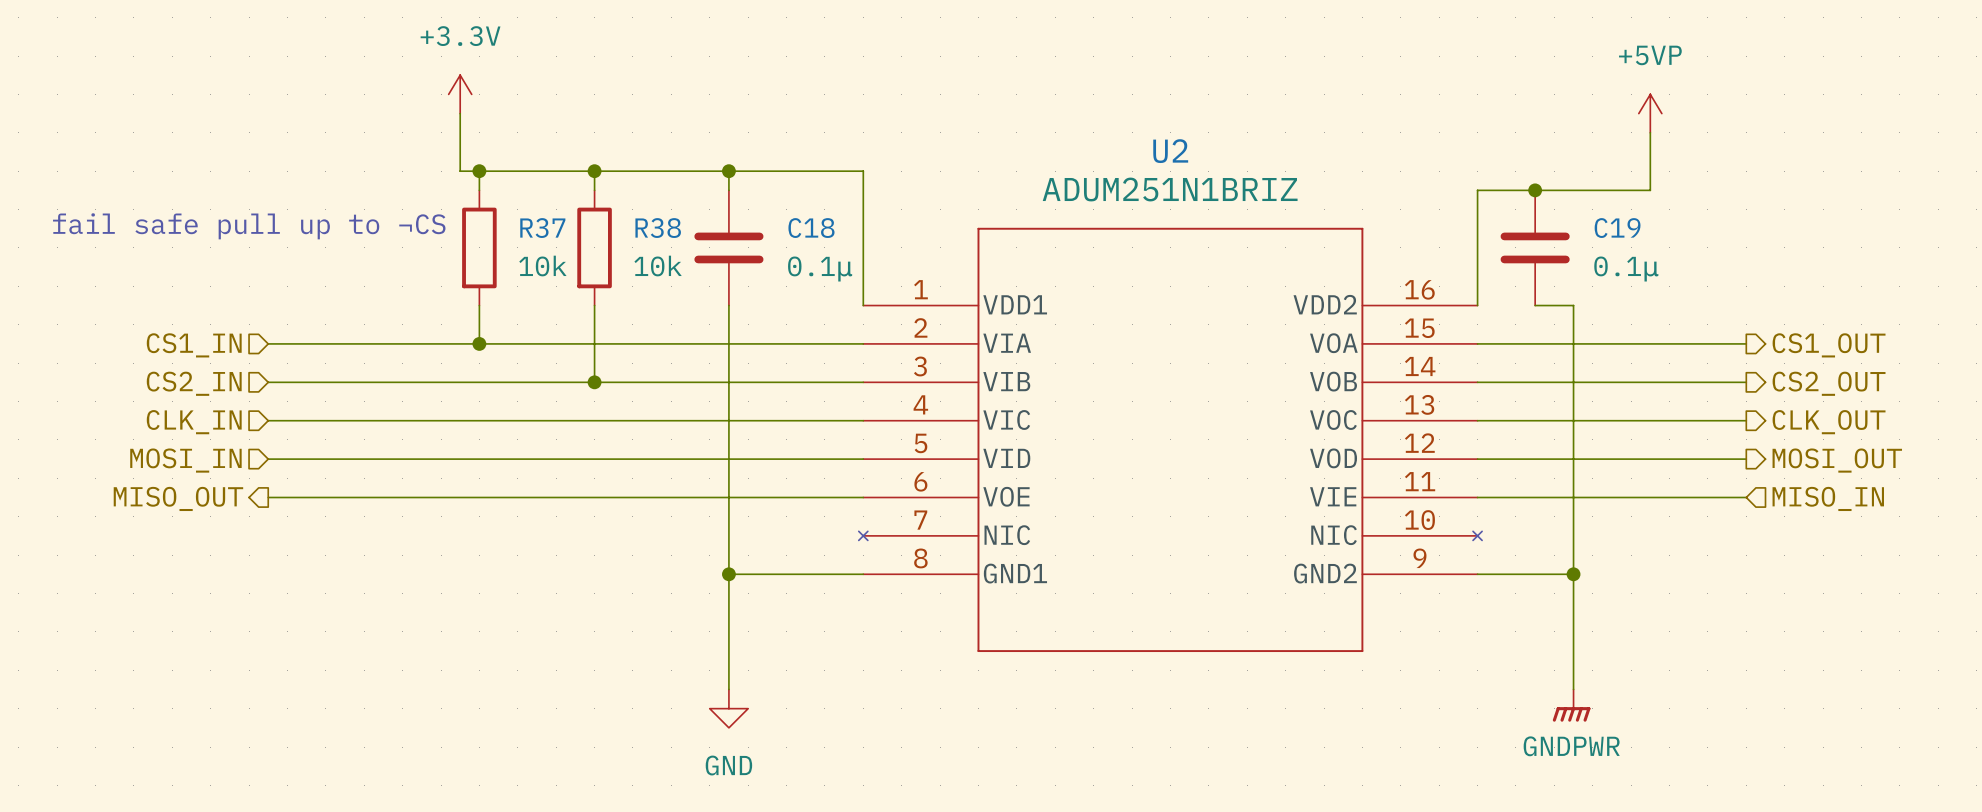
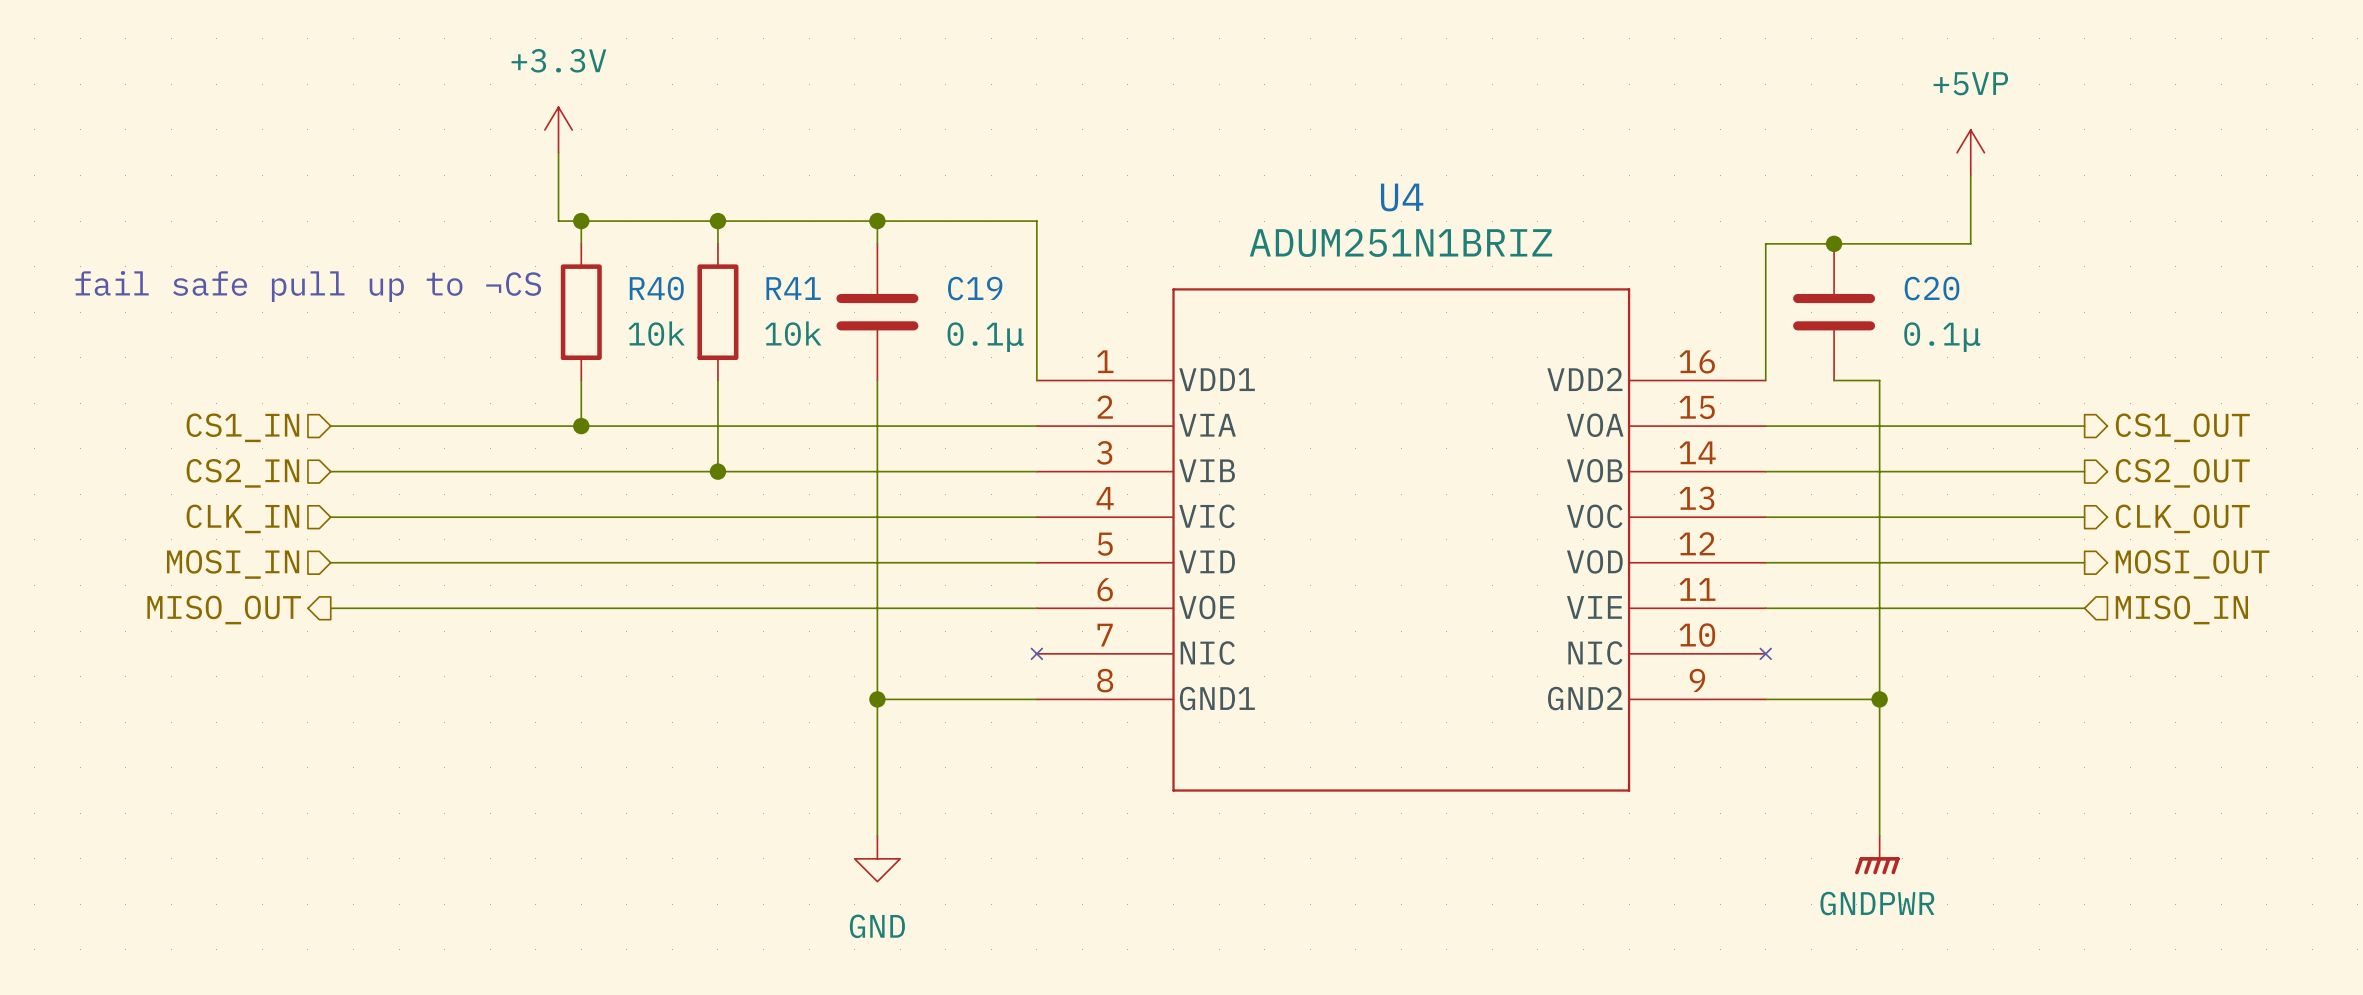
U2 name: U2 (1170, 151) -> U4 (1402, 197)
R37 name: R37 (542, 228) -> R40 (656, 288)
R38 name: R38 (658, 228) -> R41 (793, 288)
C18 name: C18 (811, 228) -> C19 (975, 288)
C19 name: C19 (1617, 228) -> C20 (1932, 288)

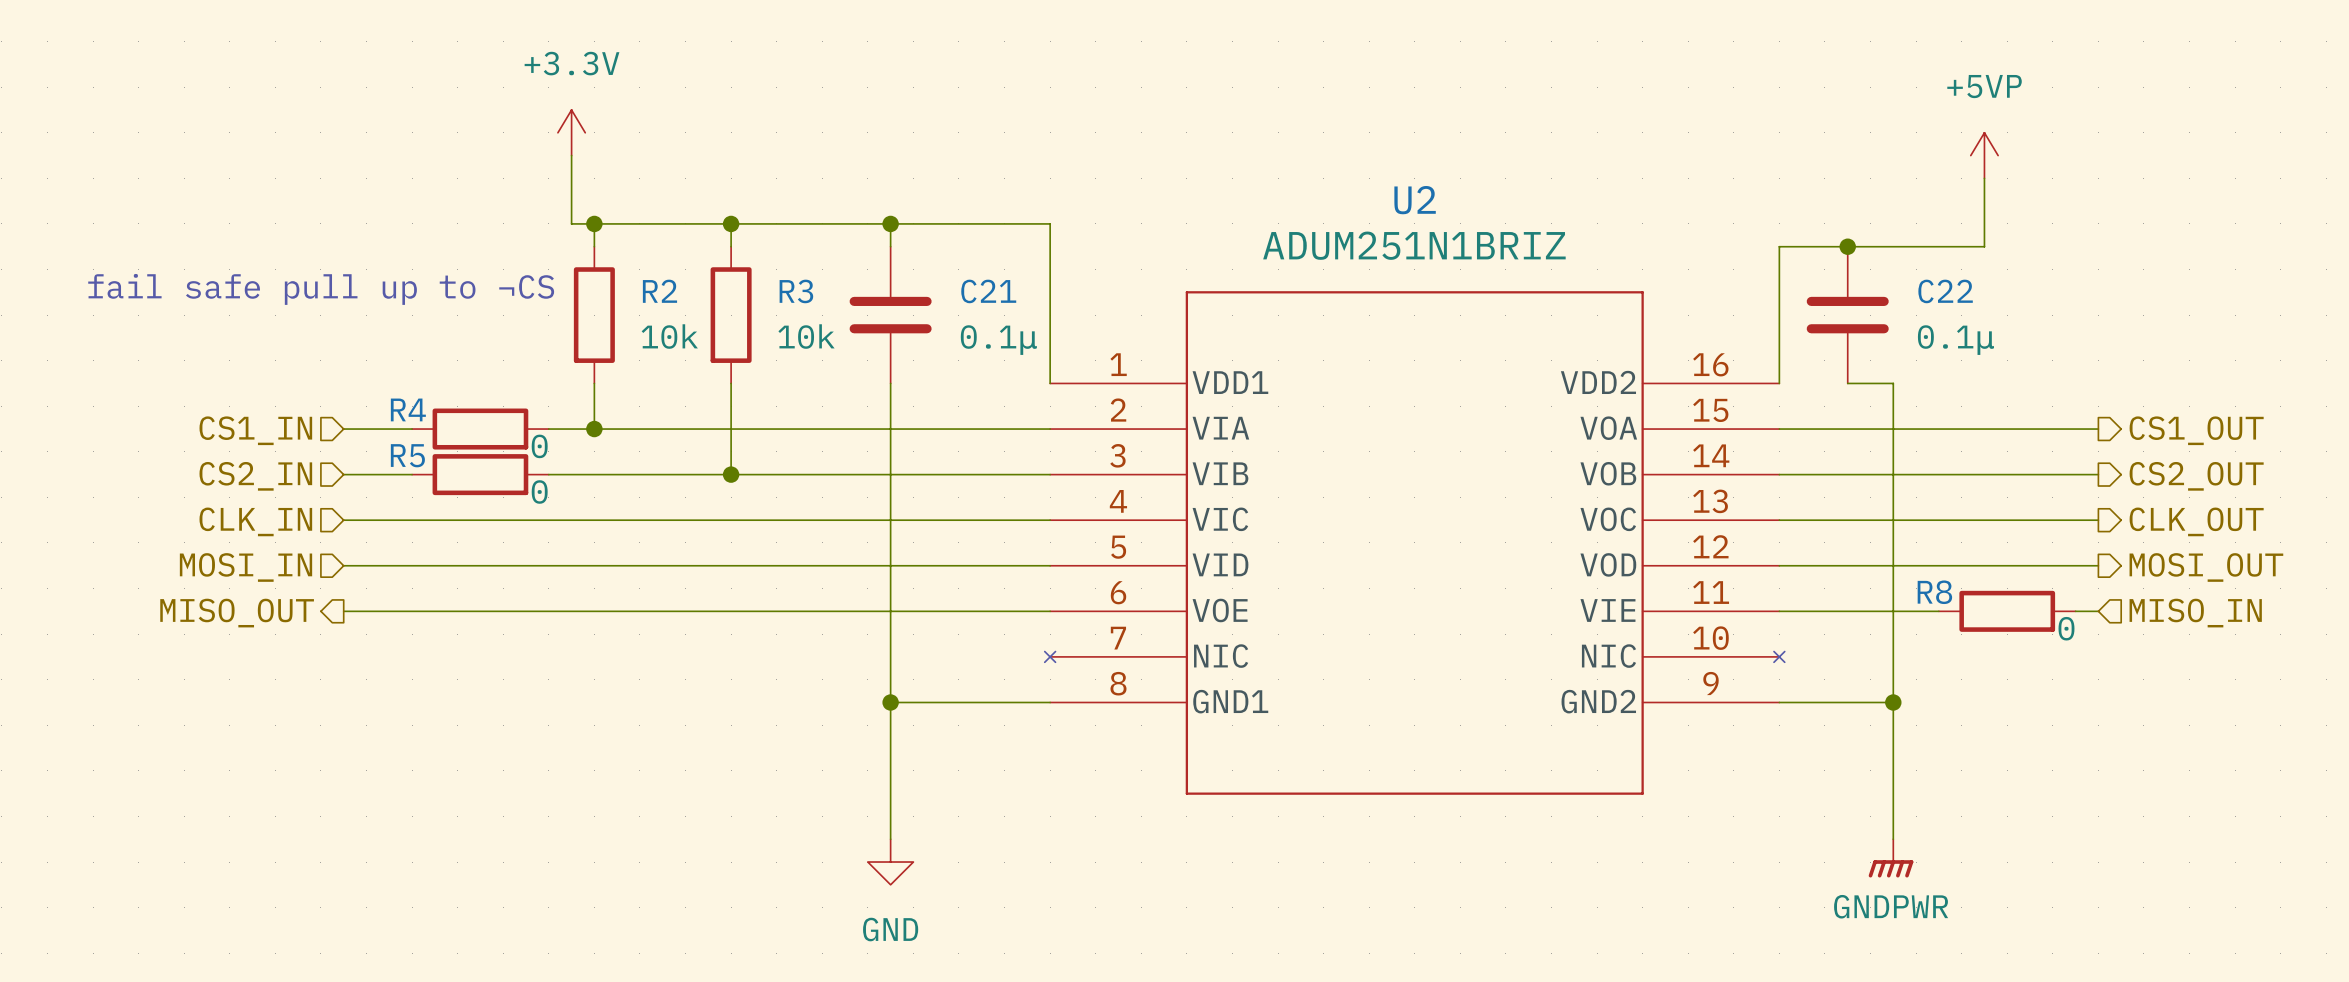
U4 name: U4 (1402, 197) -> U2 (1415, 200)
R40 name: R40 (656, 288) -> R2 (659, 291)
R41 name: R41 (793, 288) -> R3 (796, 291)
C19 name: C19 (975, 288) -> C21 (988, 291)
C20 name: C20 (1932, 288) -> C22 (1945, 291)
wire: (399, 426) (535, 426) -> none
R4: none -> 0 (480, 429)
wire: (399, 471) (535, 471) -> none
R5: none -> 0 (480, 474)
wire: (1925, 608) (2061, 608) -> none
R8: none -> 0 (2007, 611)

